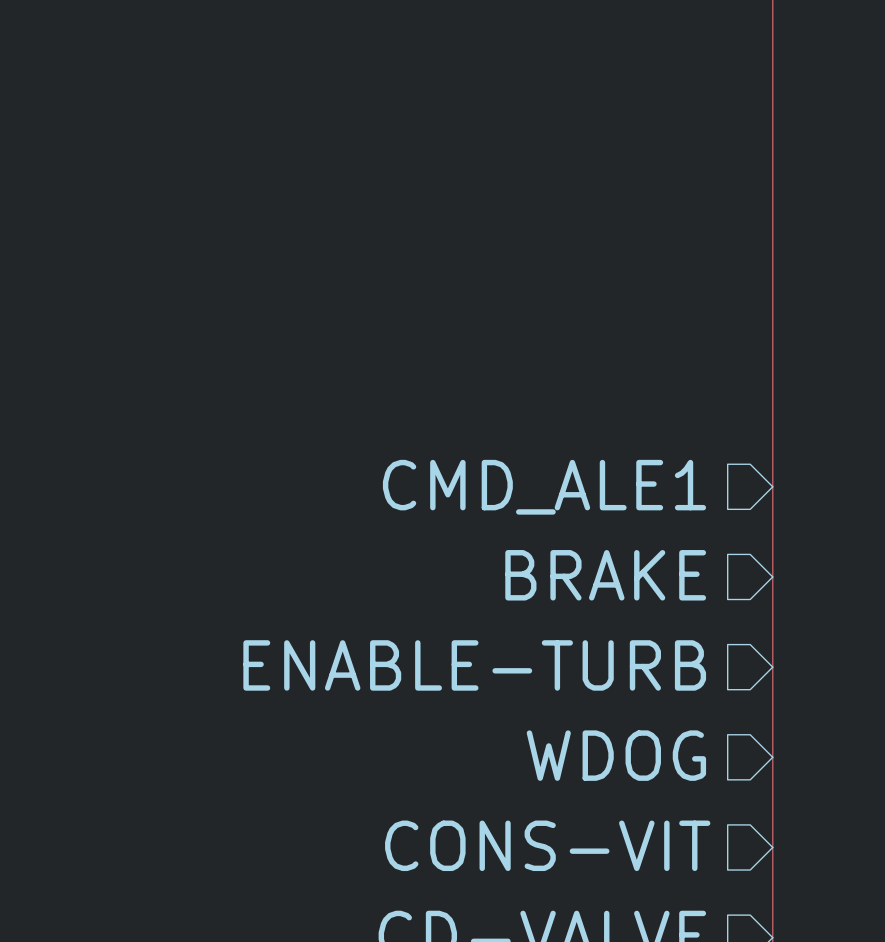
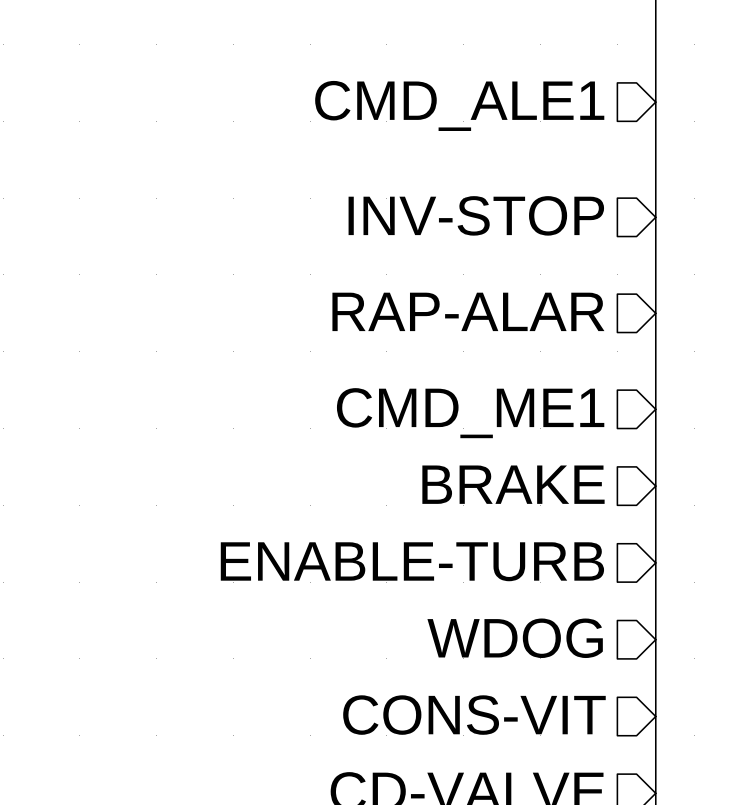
sheet pin: none -> CMD_ALE1 (459, 105)
sheet pin: none -> INV-STOP (476, 215)
sheet pin: none -> RAP-ALAR (468, 311)
sheet pin: CMD_ALE1 (544, 487) -> CMD_ME1 (470, 413)

